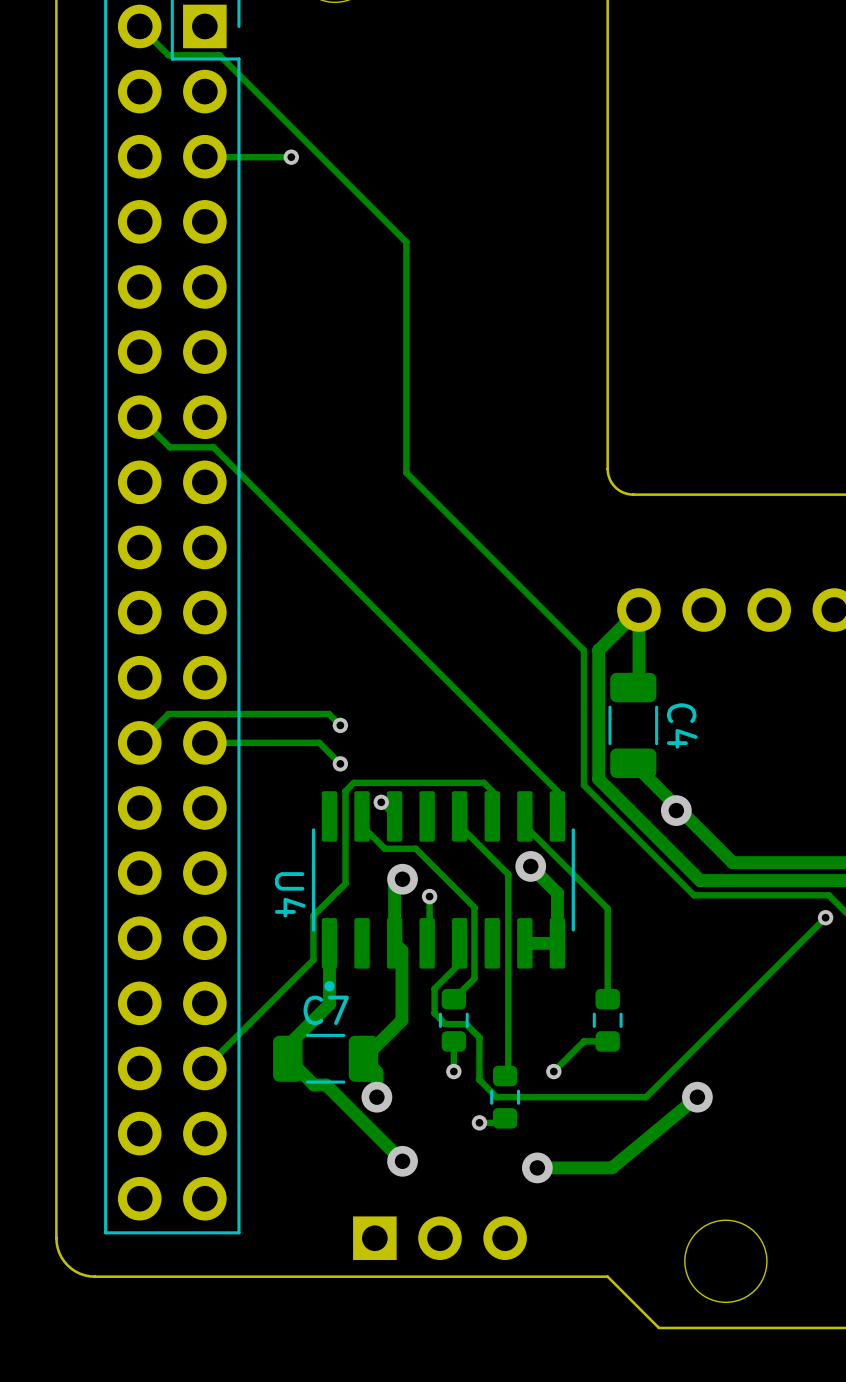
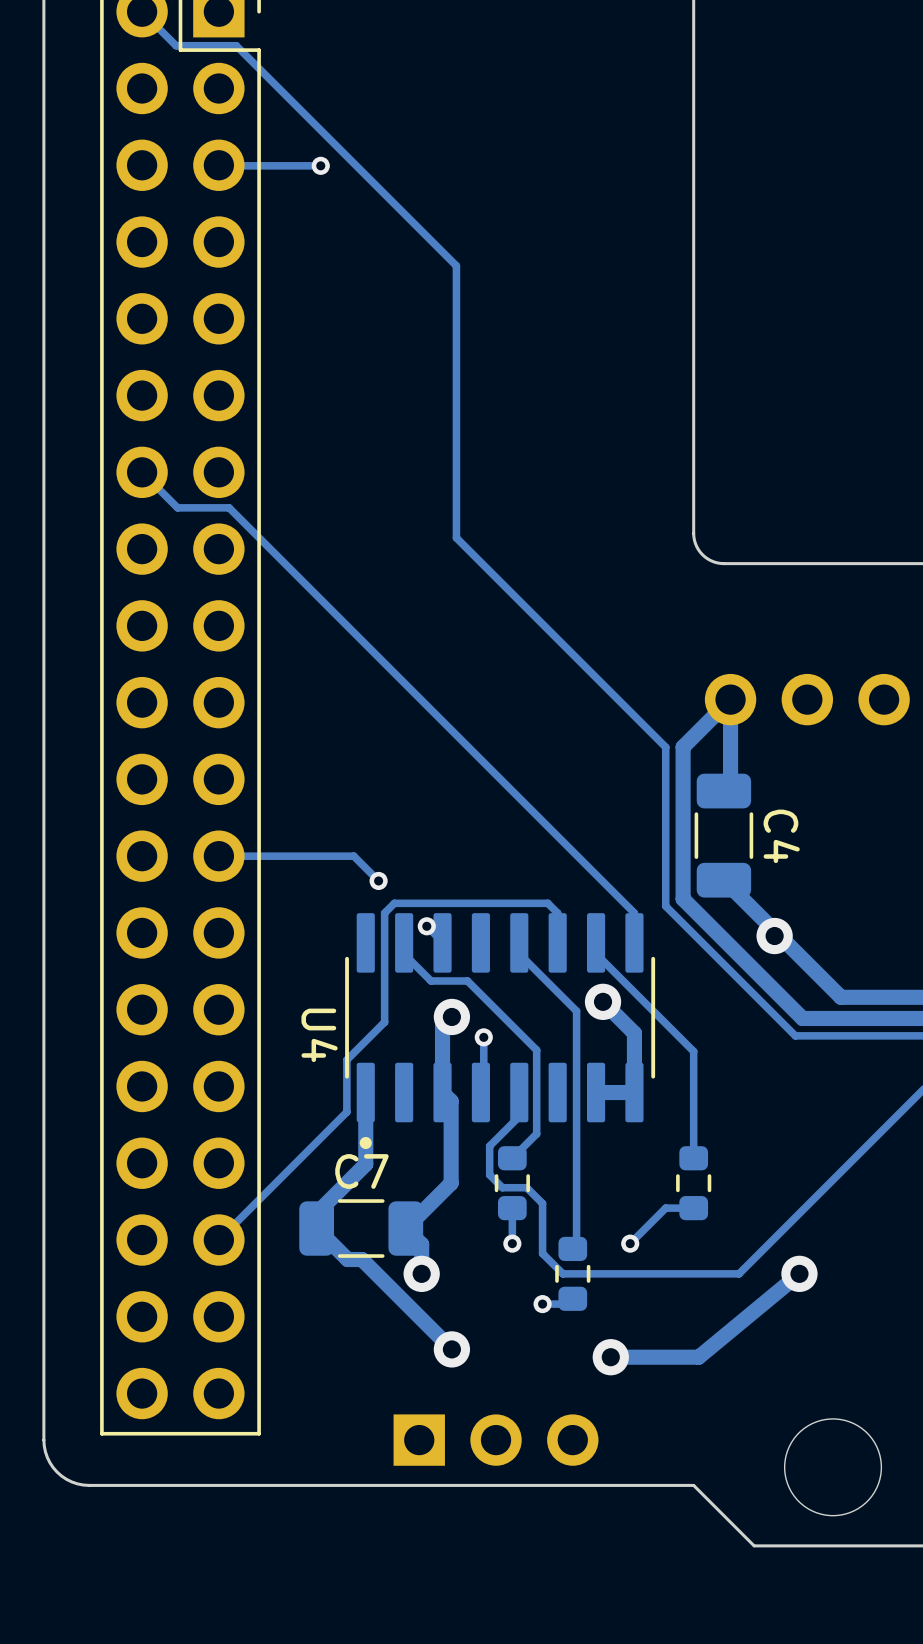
track: (340, 725) (328, 713) (168, 713) (139, 742) -> none
via: (340, 725) -> none

